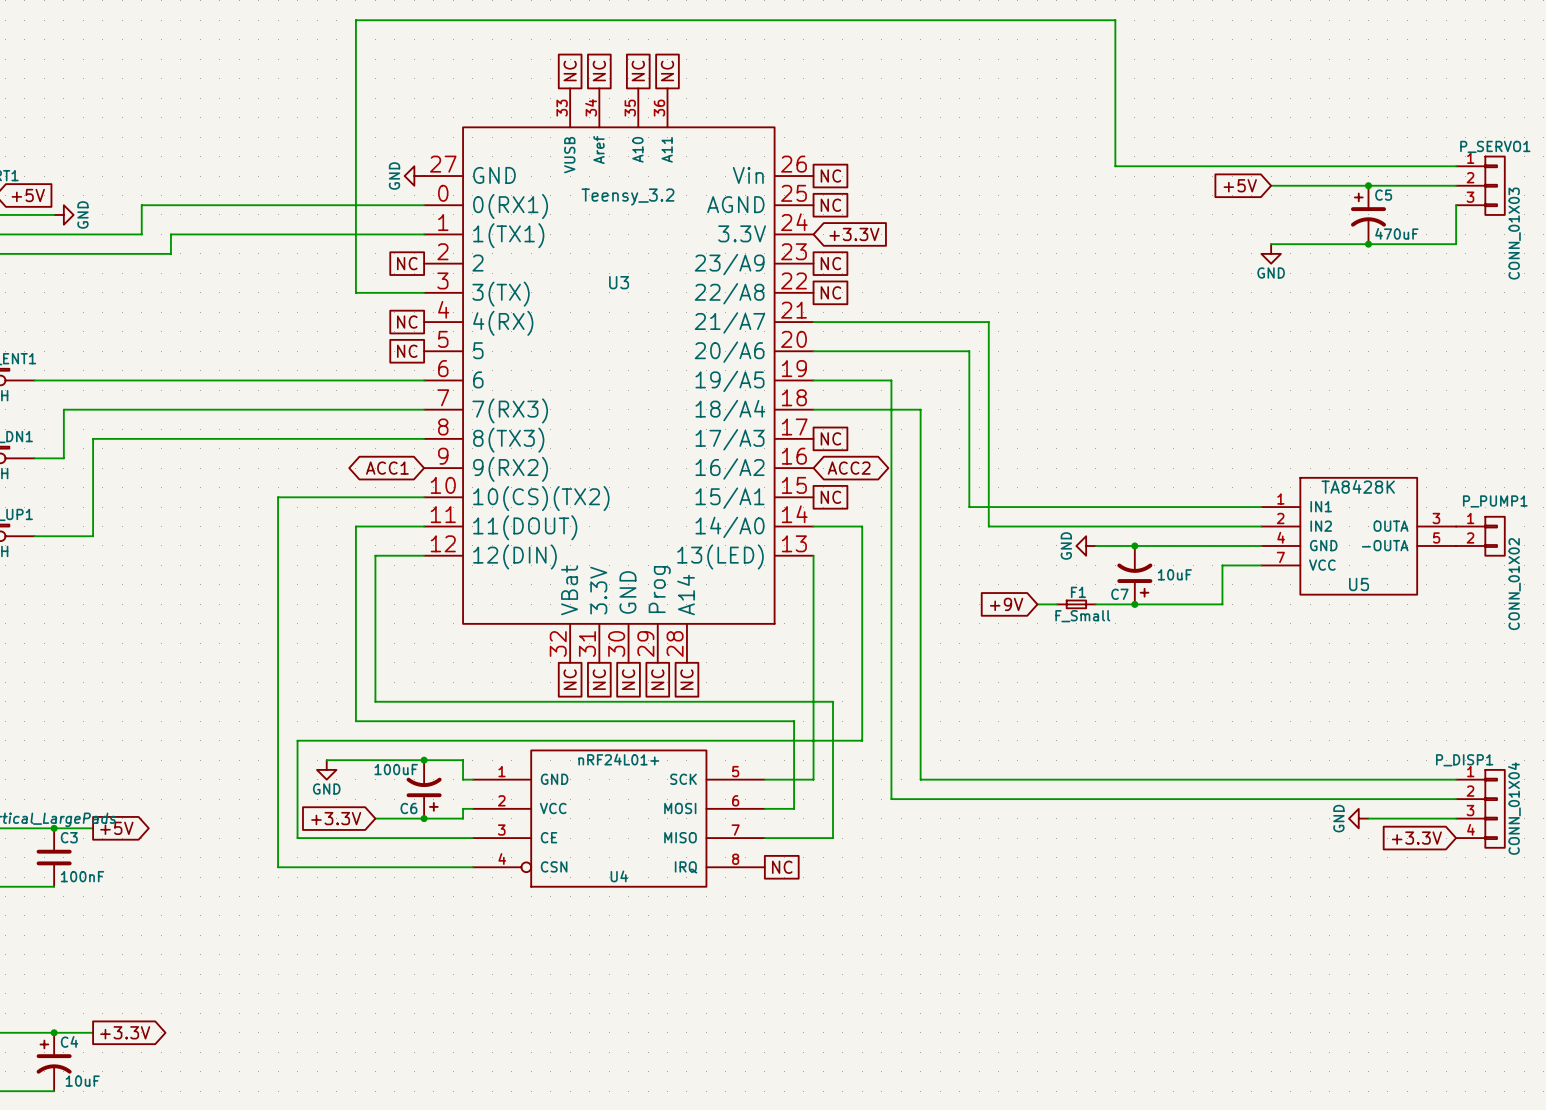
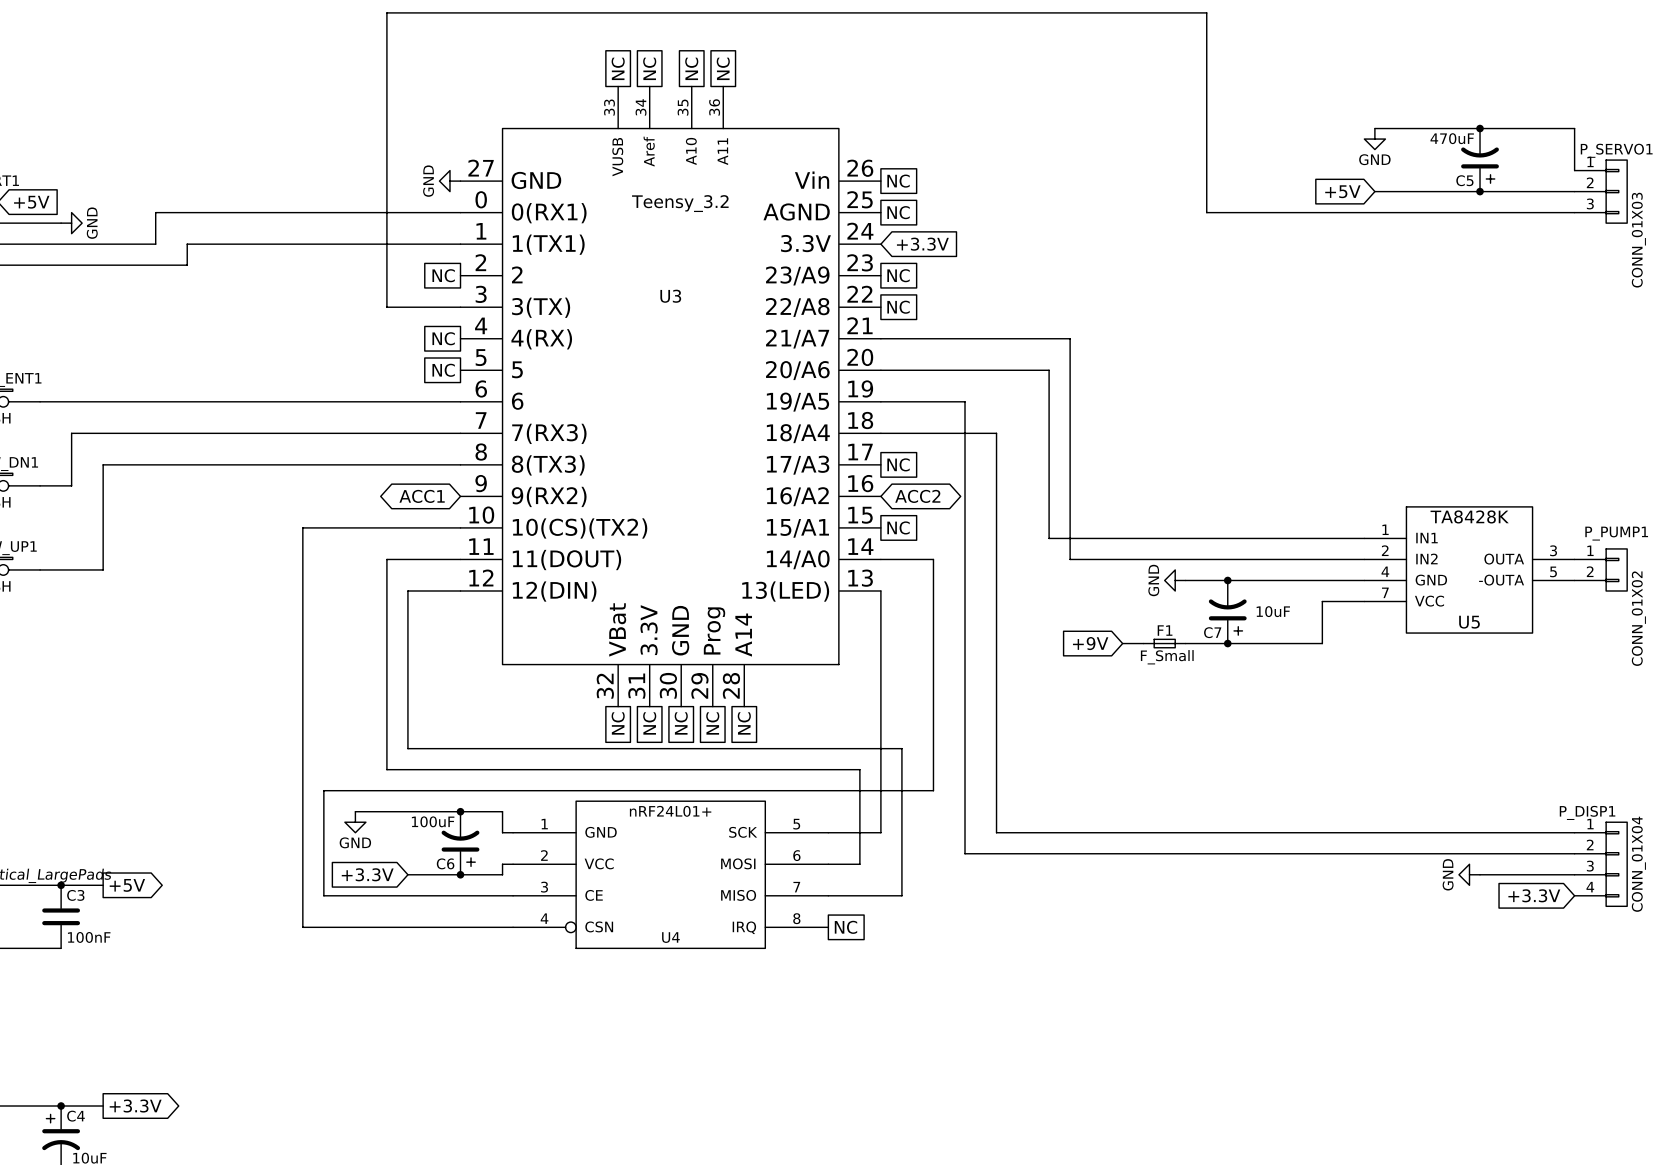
wire: none -> (1374, 128) (1574, 128) (1574, 170)
junction: none -> (1480, 128)
wire: (1115, 166) (1456, 166) -> (1206, 170) (1206, 212) (1574, 212)
wire: (1456, 205) (1456, 244) (1271, 244) -> none
C5 rotation: 0° (1368, 210) -> 180° (1480, 165)
C5 position: (1368, 214) -> (1480, 160)
junction: (1368, 244) -> none
power symbol position: GND (1271, 253) -> GND (1374, 139)

